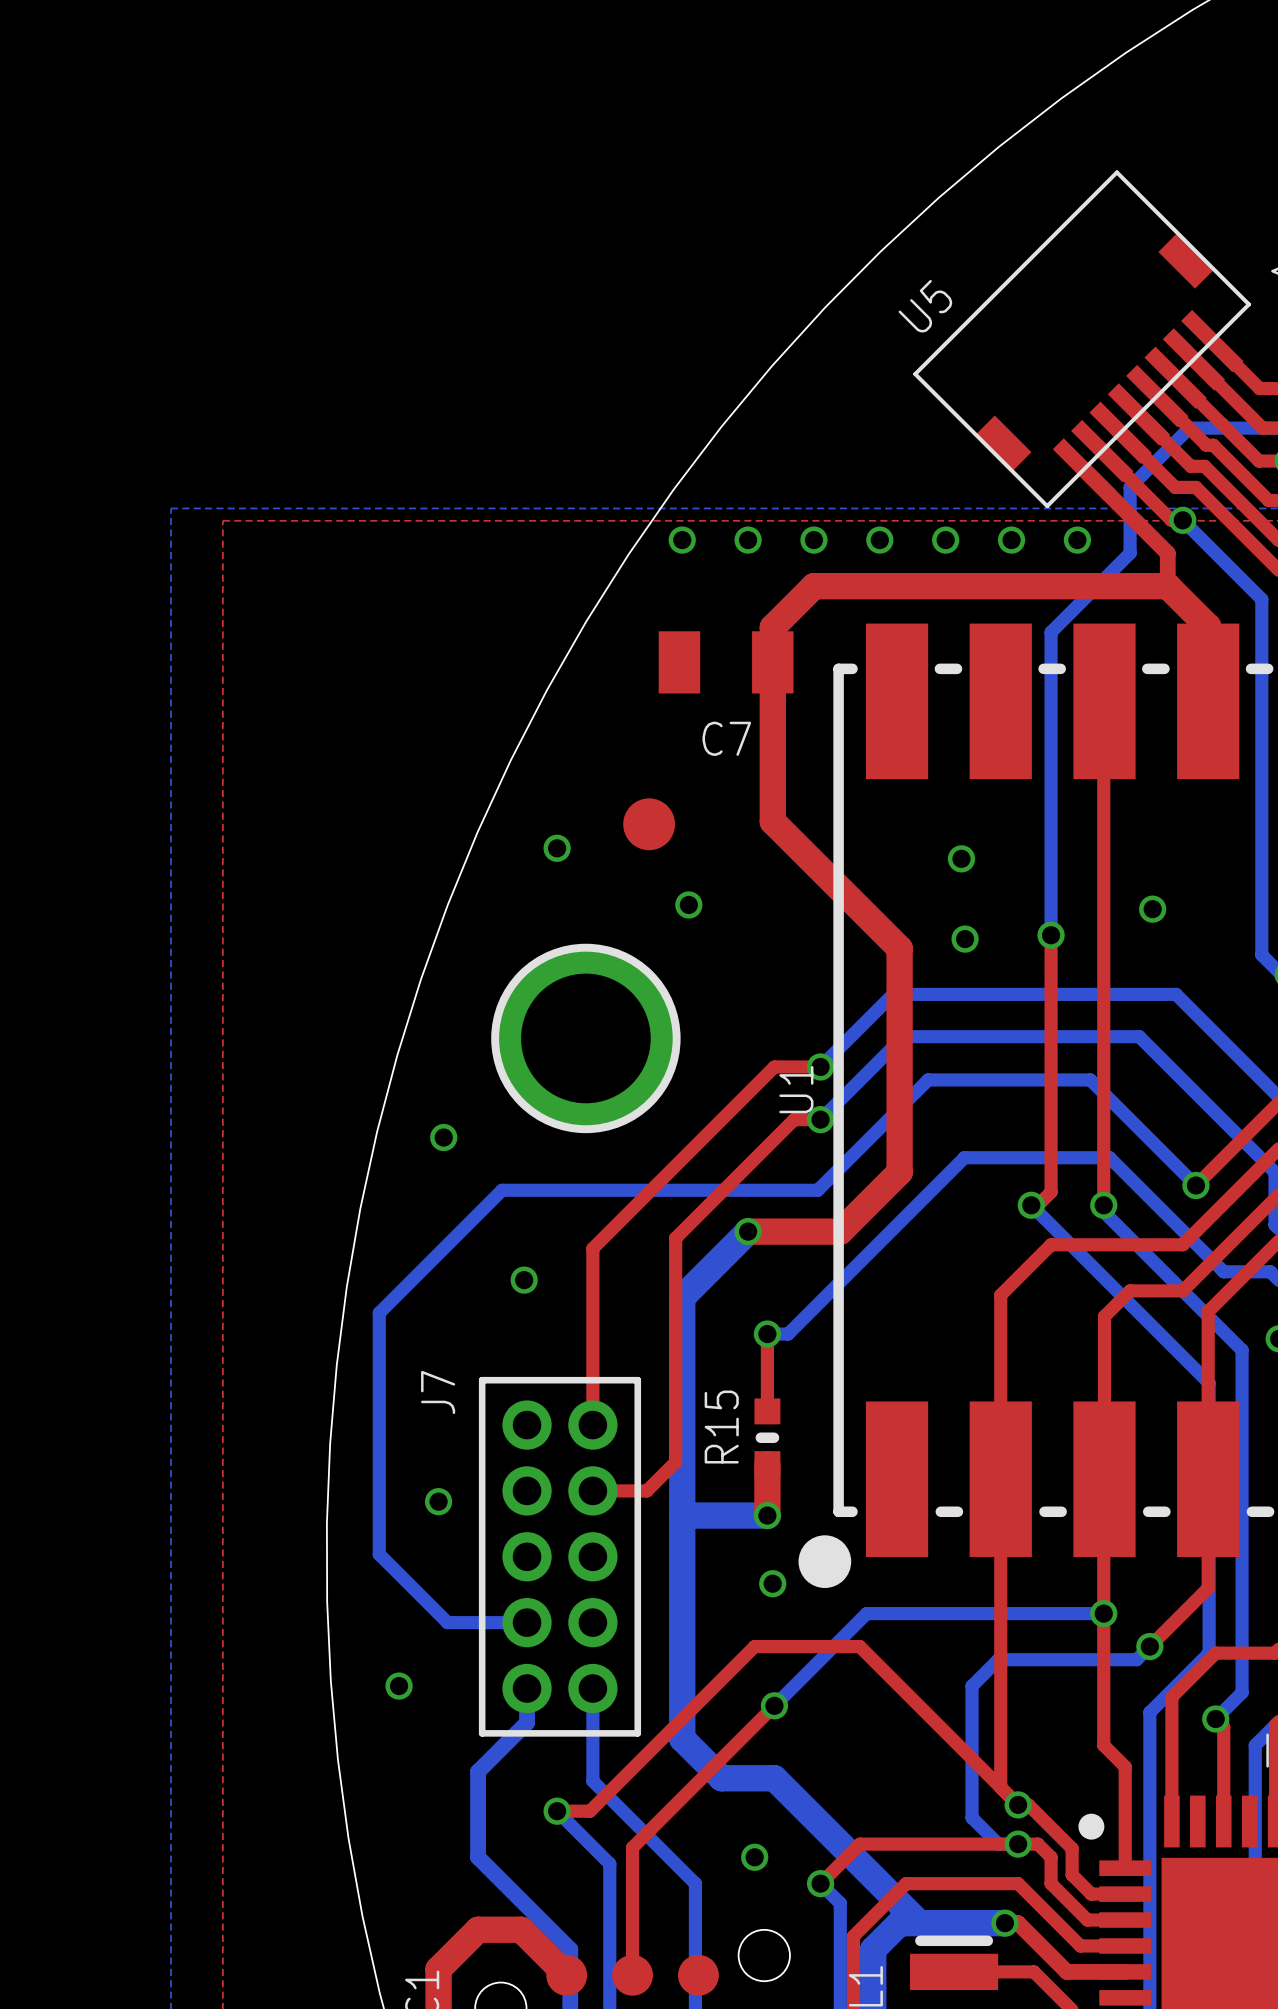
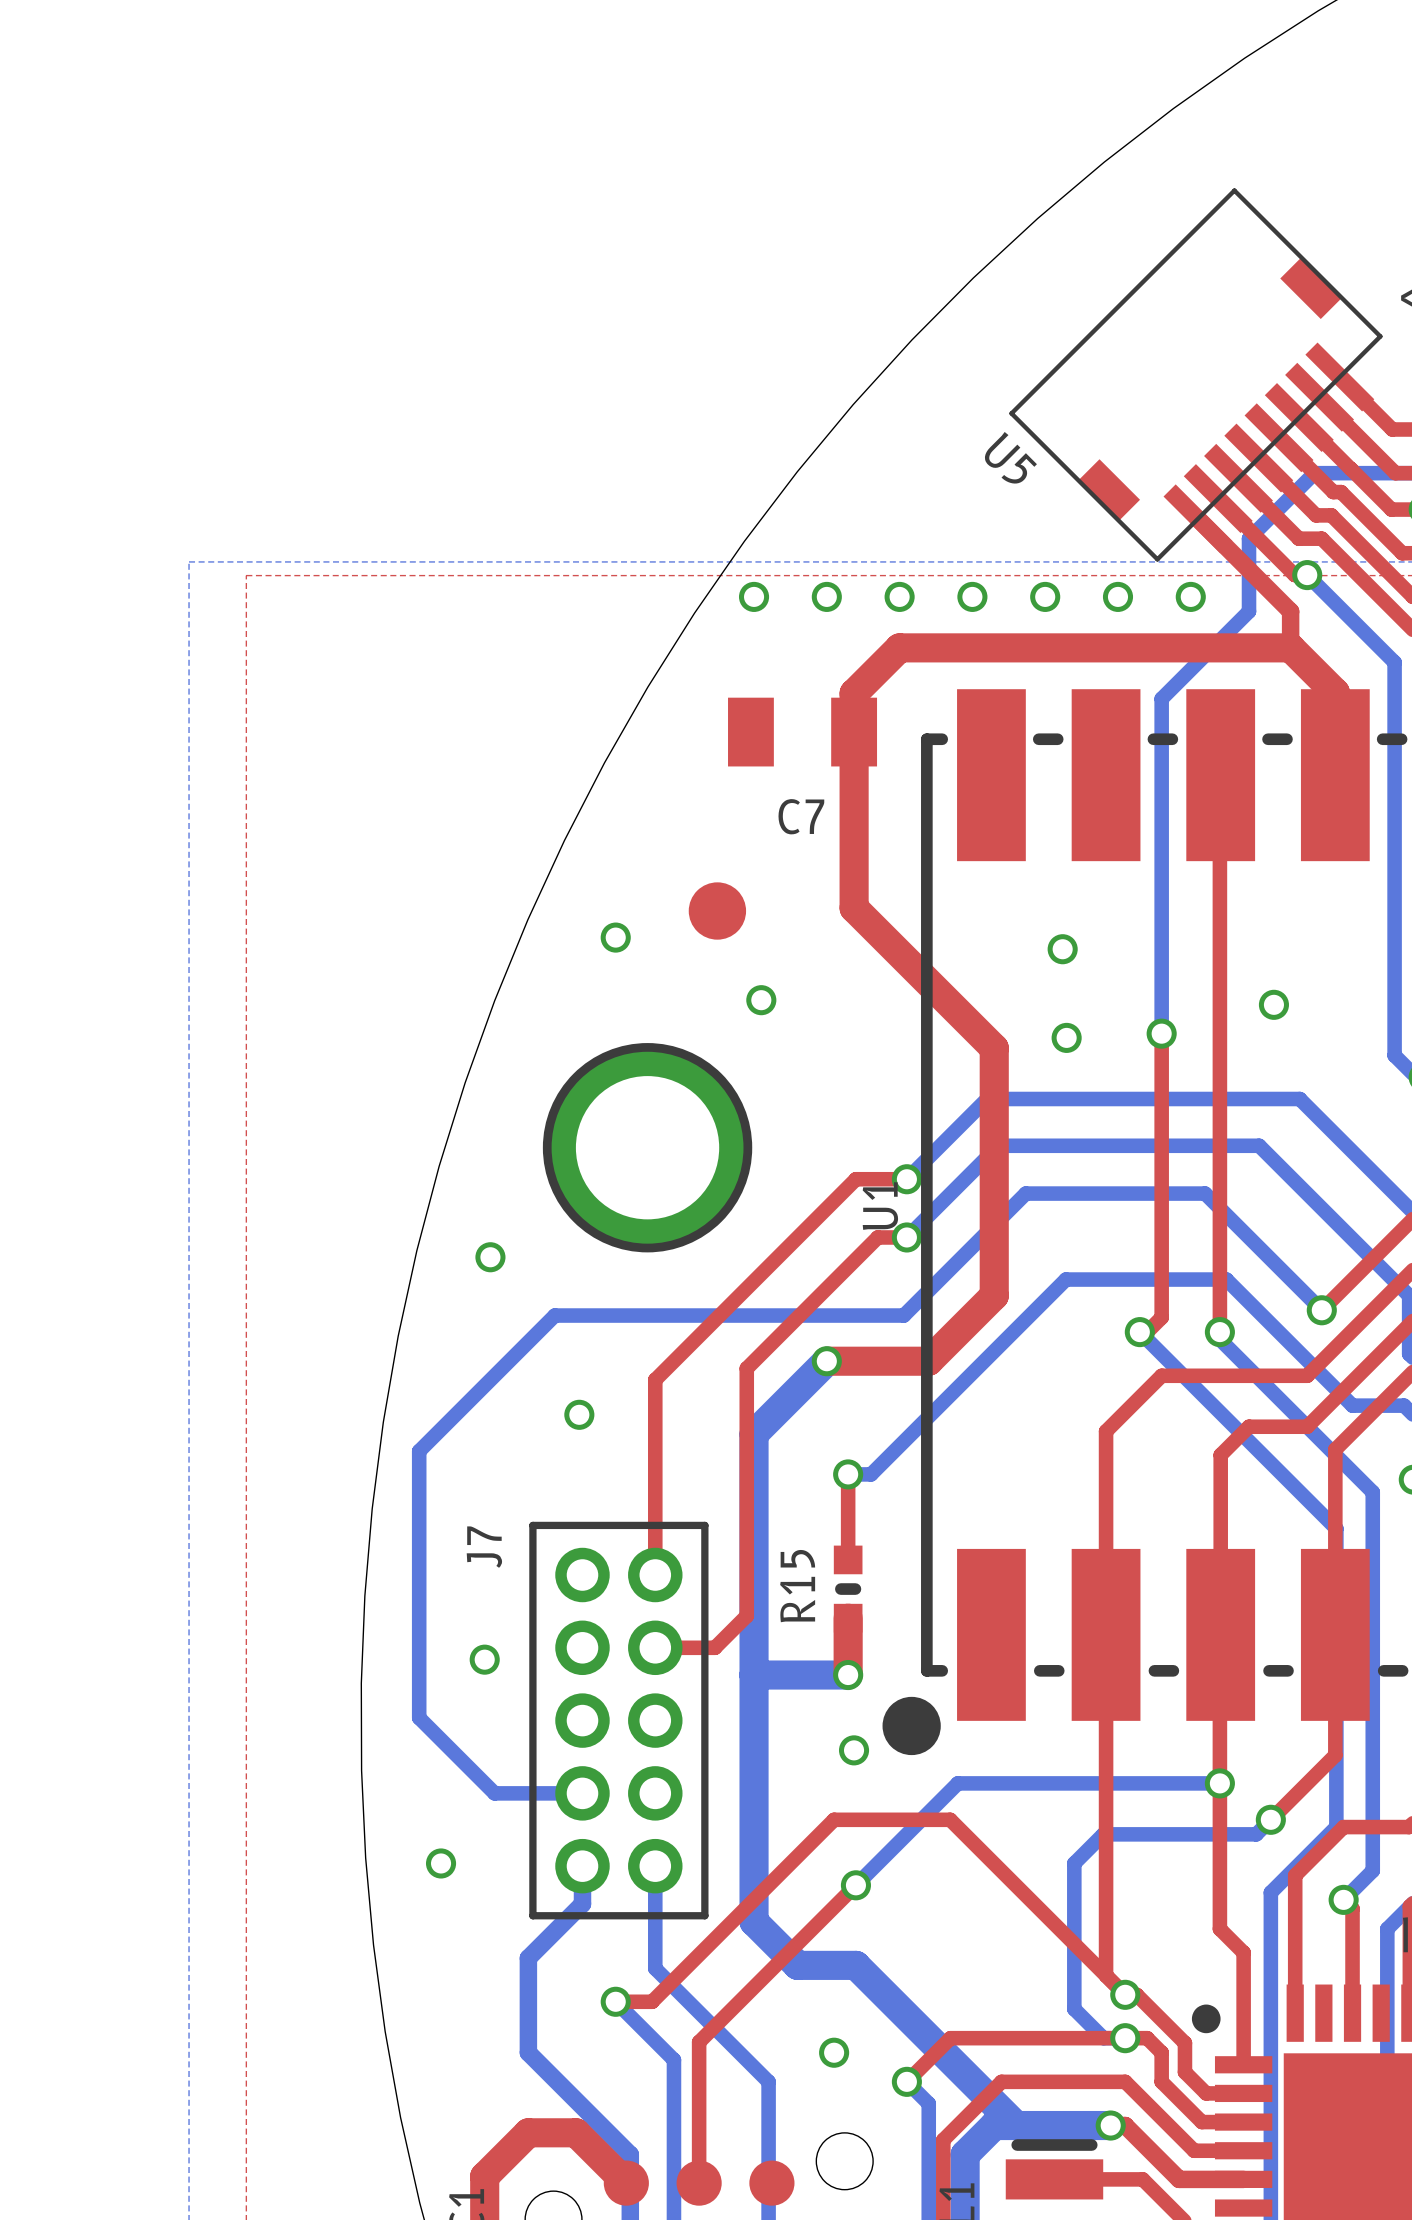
U5 name rotation: 0° (925, 306) -> 90° clockwise (1010, 457)
U5 name position: U5 (925, 306) -> U5 (1010, 457)

